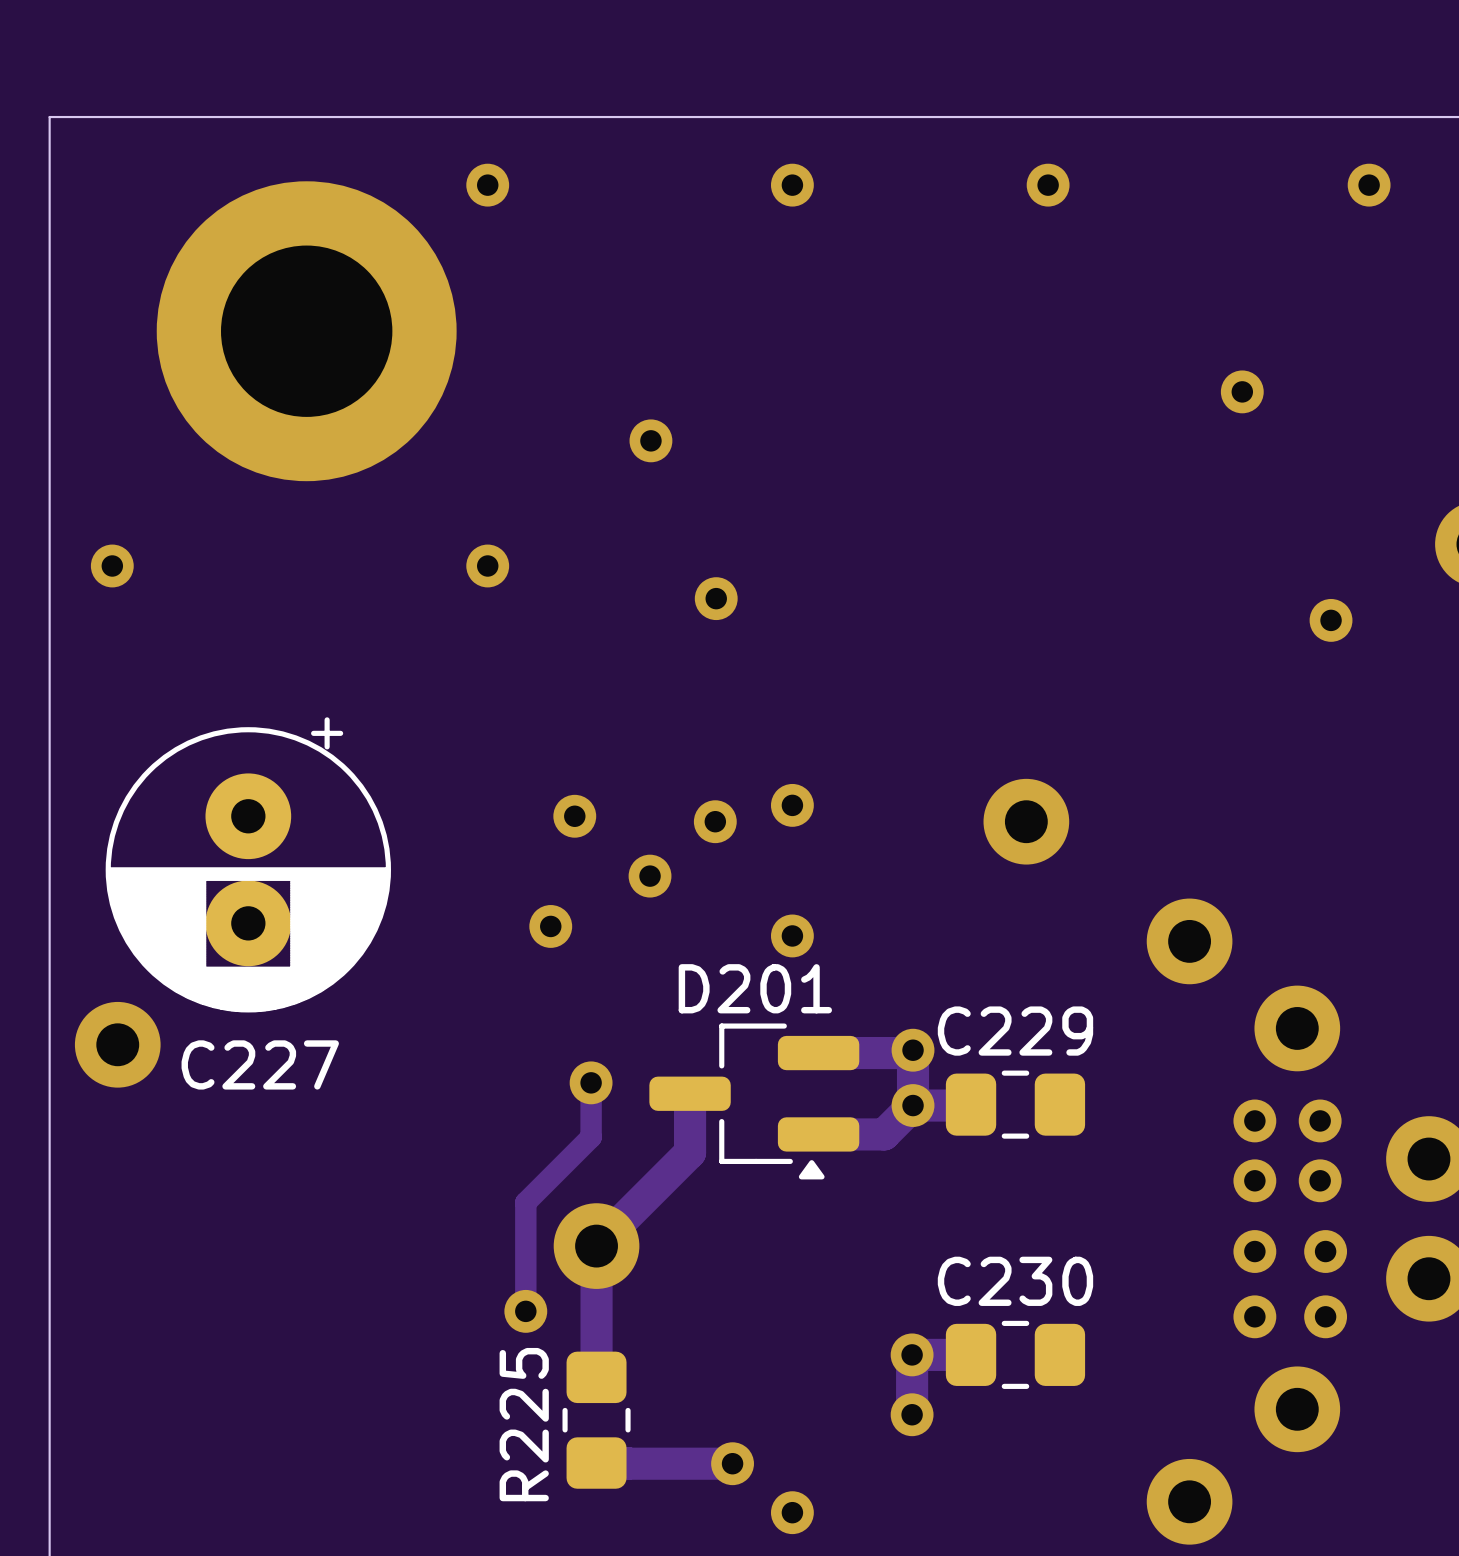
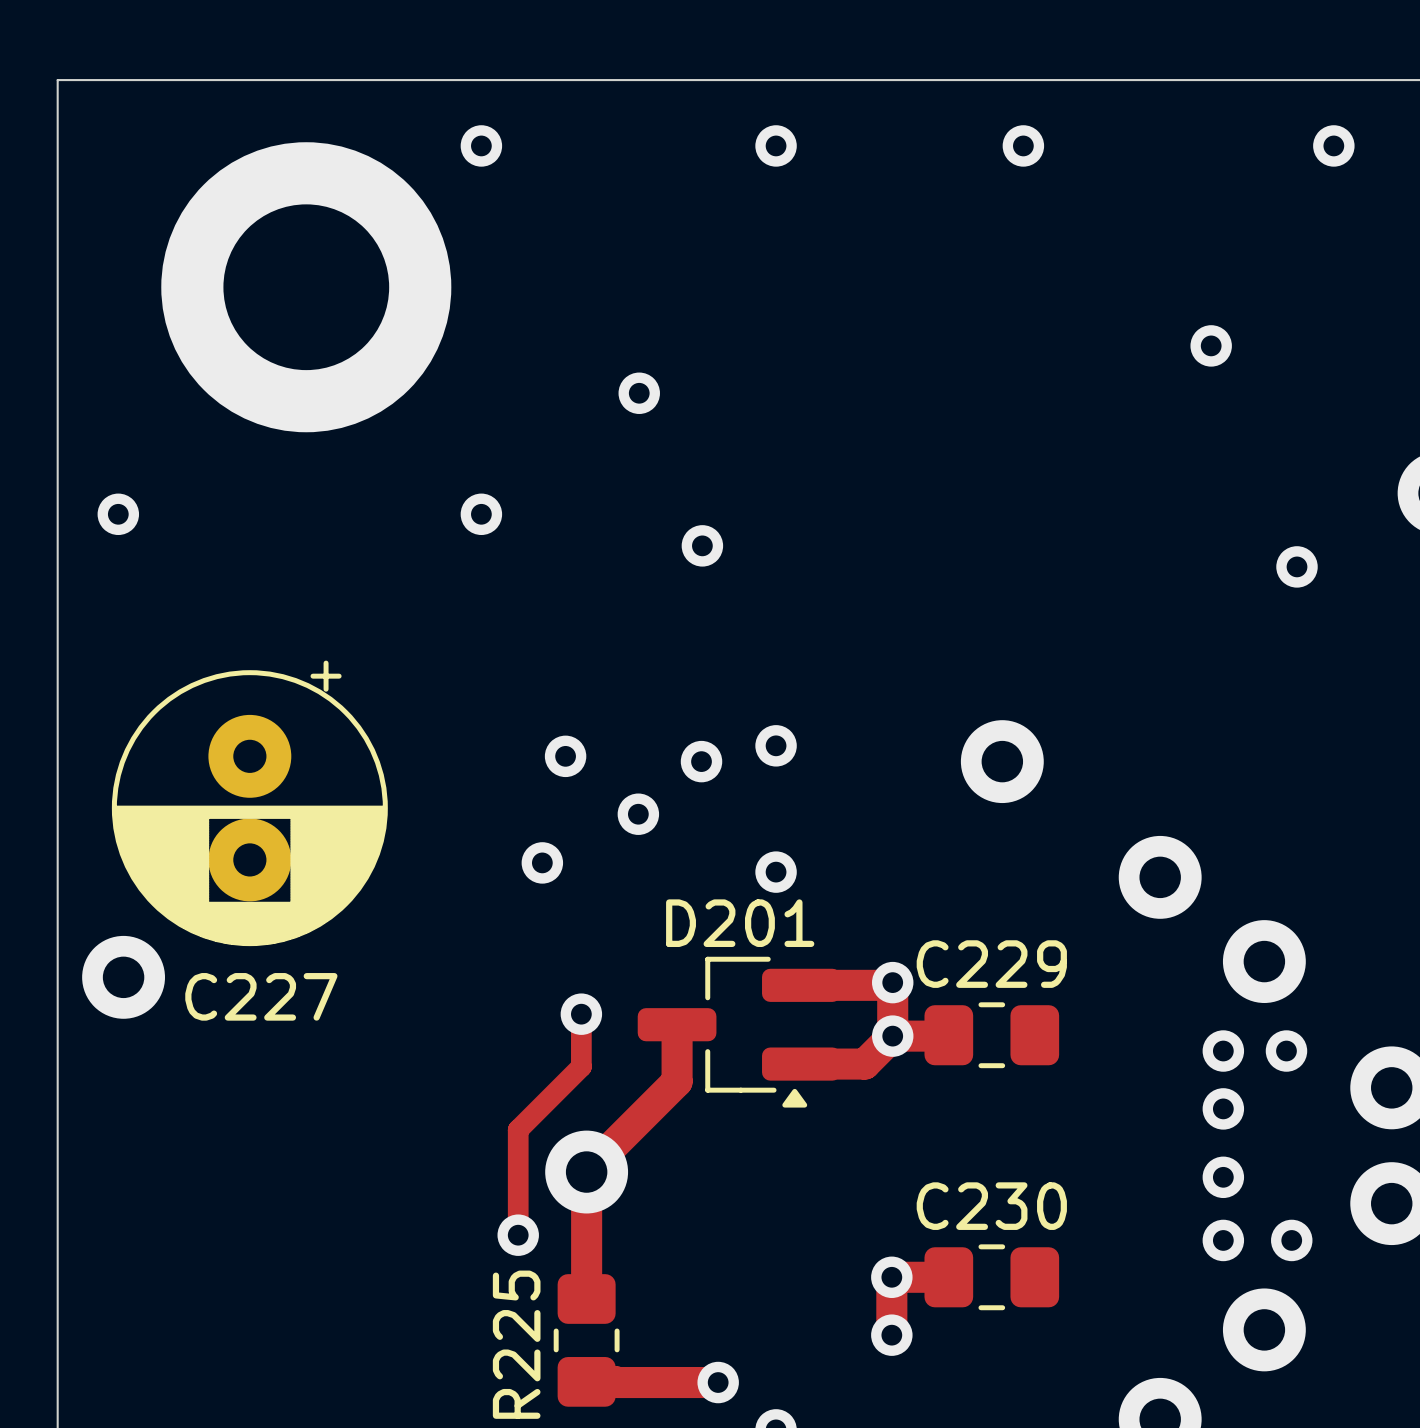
via: (1320, 1180) -> none
via: (1325, 1251) -> none

